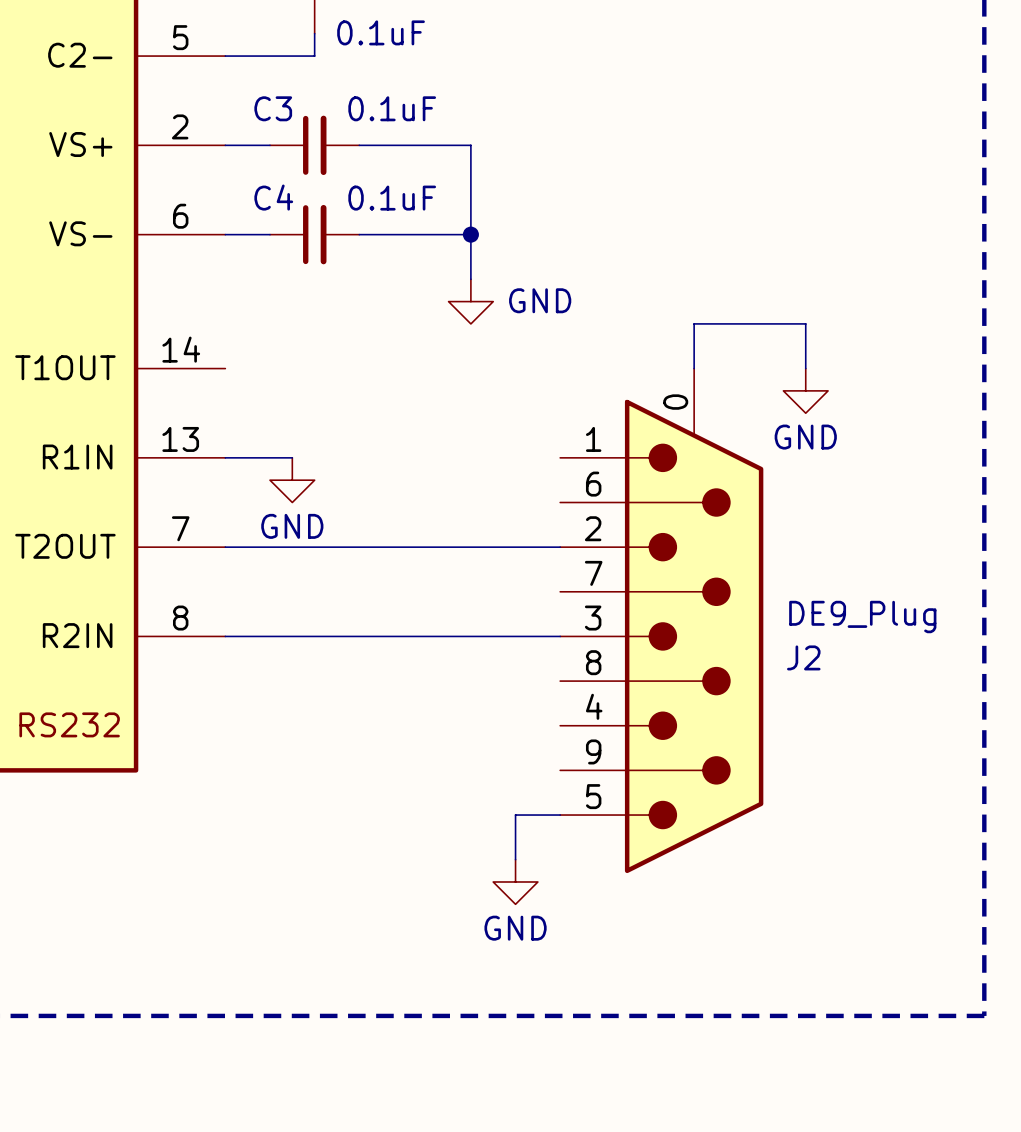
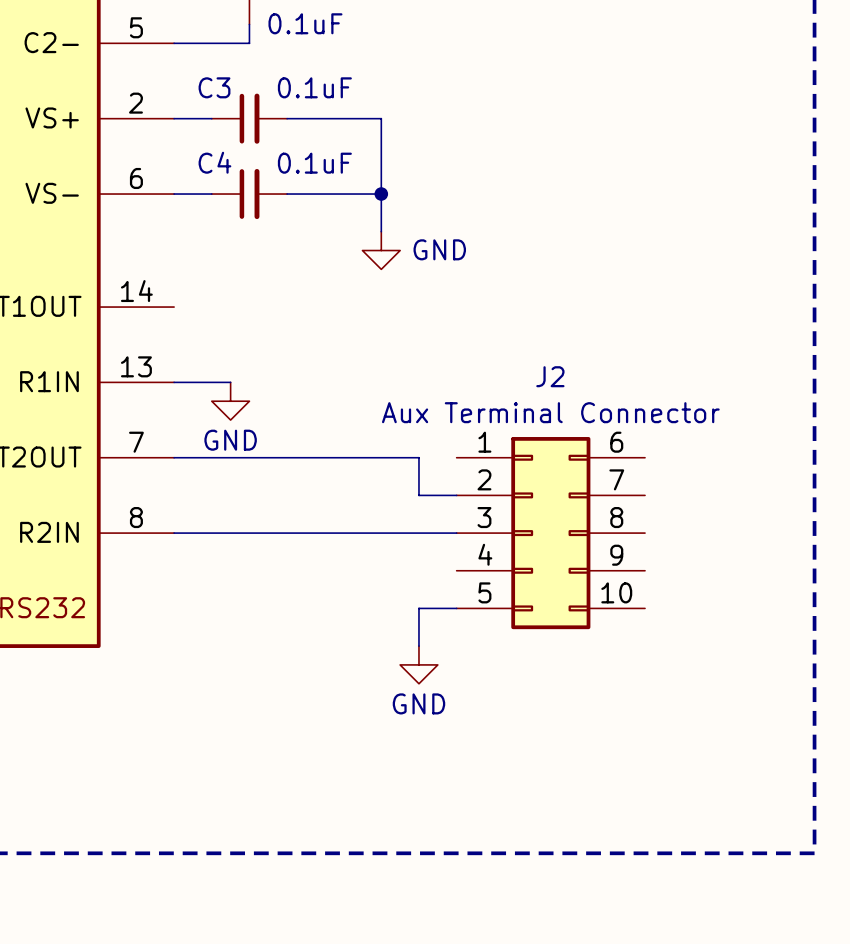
J2 symbol: [560, 368, 764, 874] -> [456, 437, 646, 630]
wire: (694, 368) (694, 323) (805, 323) (805, 368) -> none
power symbol: GND (805, 390) -> none
wire: (515, 547) (560, 547) -> (418, 457) (418, 495) (456, 495)
J2 value: DE9_Plug (862, 617) -> Aux Terminal Connector (550, 412)
J2 name position: J2 (803, 657) -> J2 (550, 376)
wire: (560, 815) (515, 815) (515, 859) -> (456, 608) (418, 608) (418, 646)
power symbol position: GND (515, 881) -> GND (418, 664)

